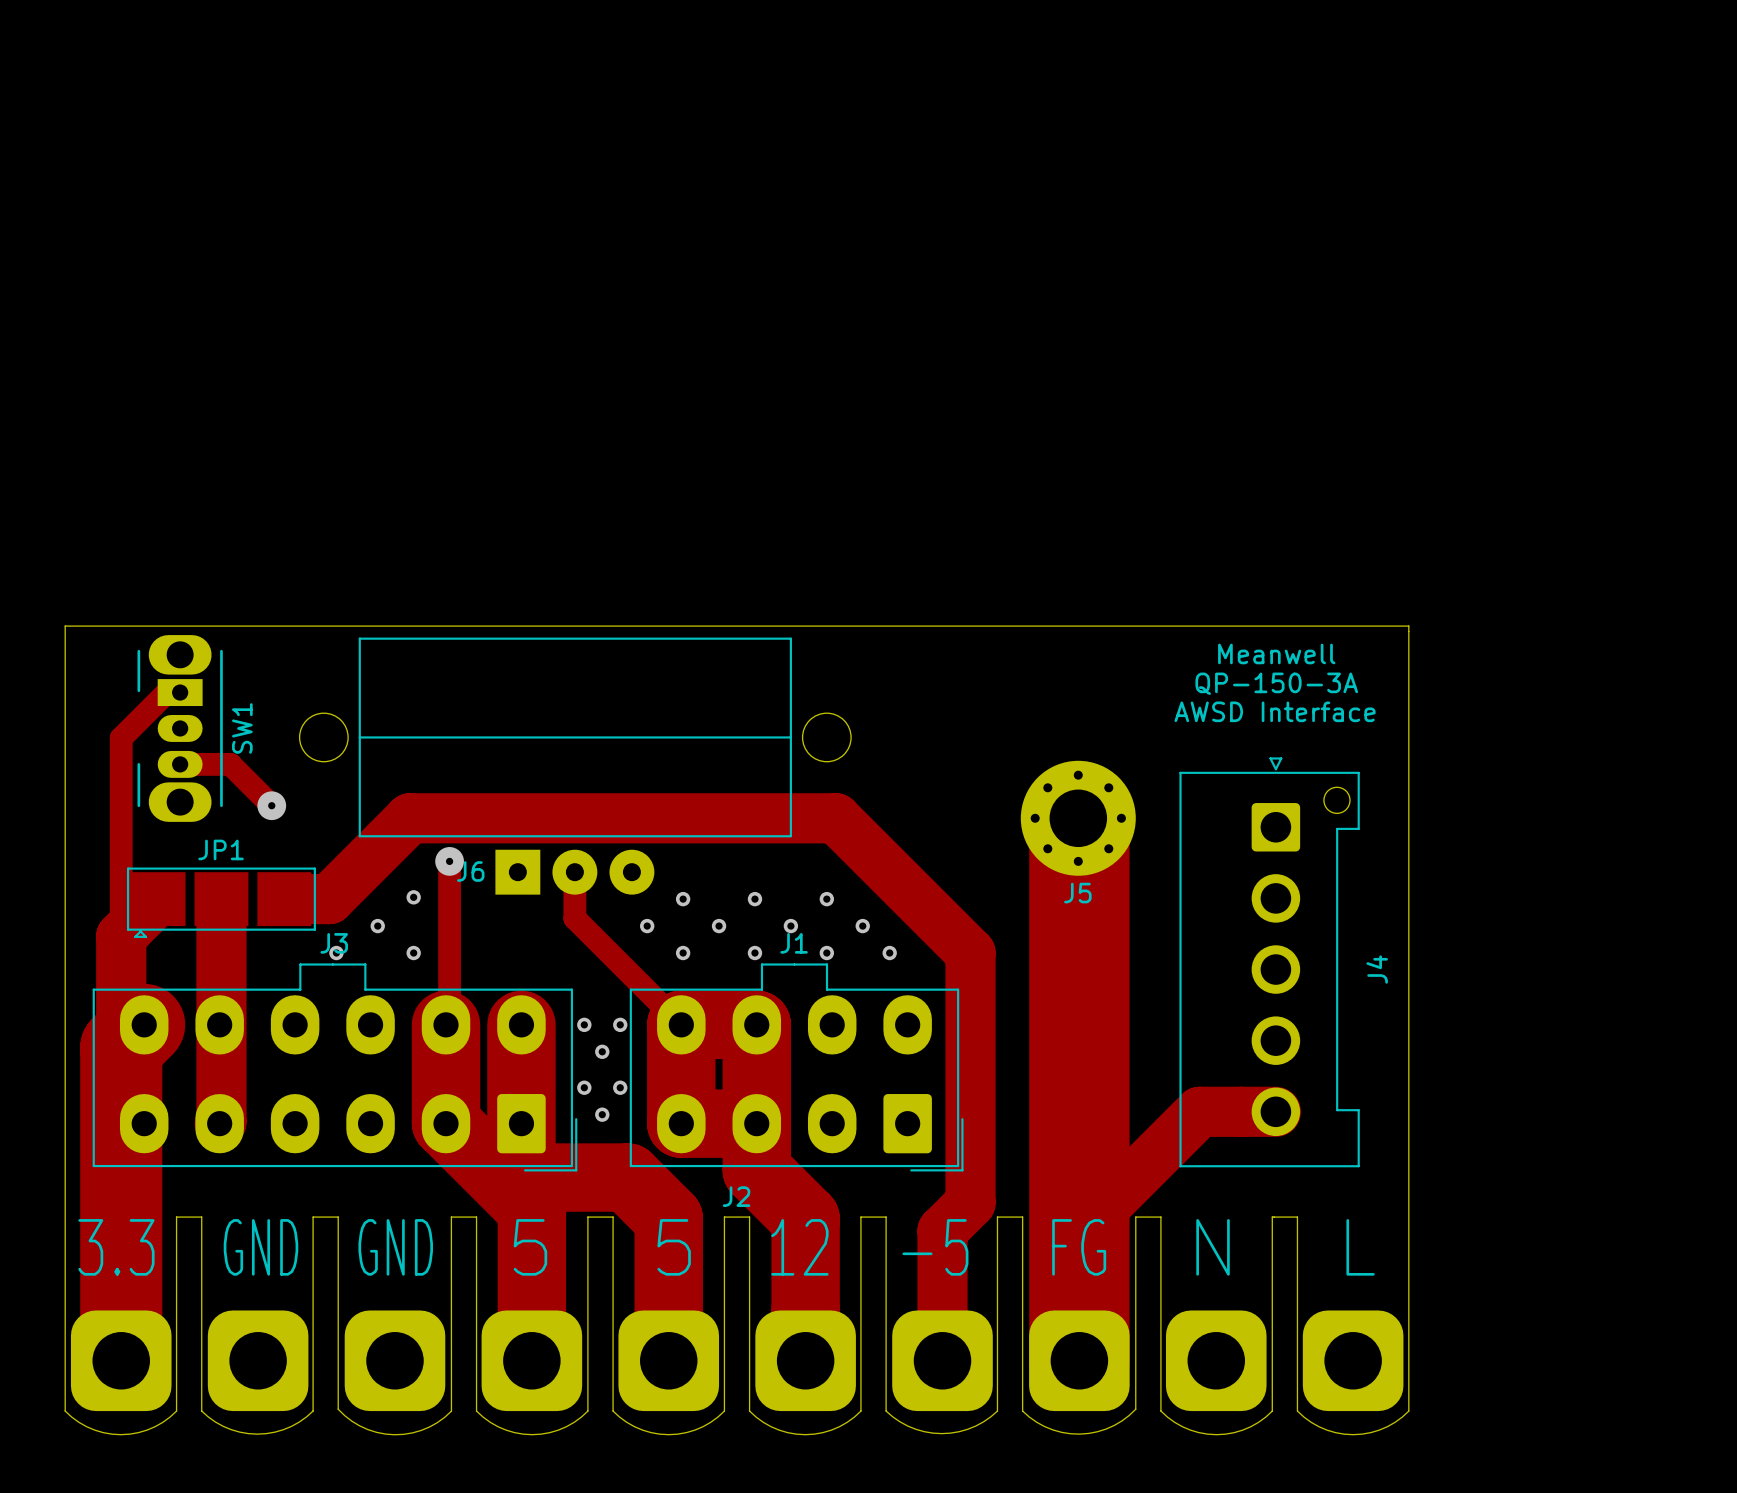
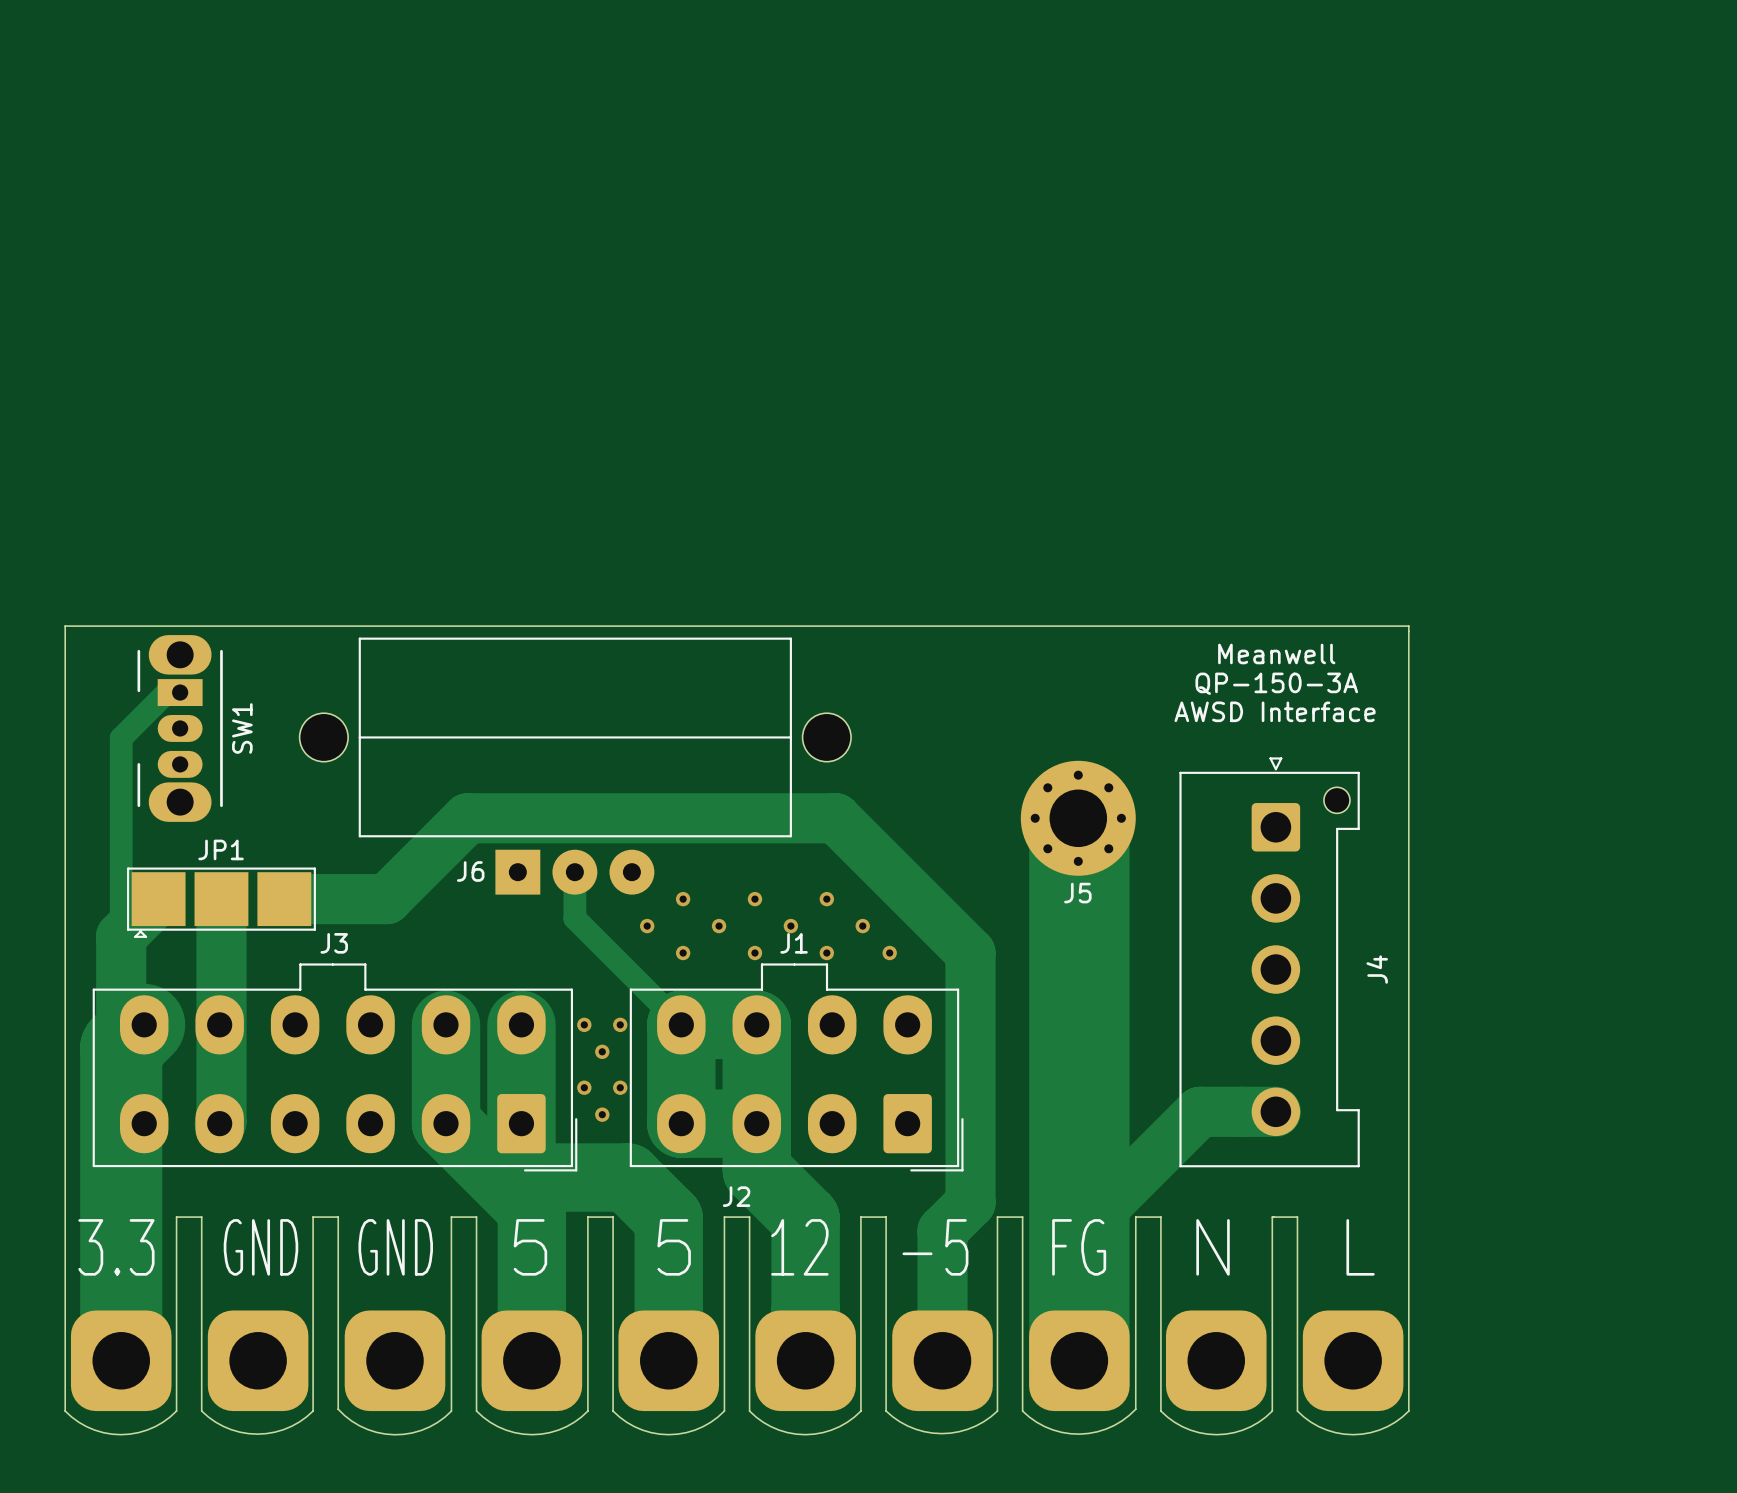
track: (180, 764) (230, 764) (273, 807) -> none
via: (271, 805) -> none
track: (467, 818) (410, 818) (329, 899) -> (467, 818) (386, 899) (329, 899)
track: (449, 861) (449, 1021) (446, 1024) -> none
via: (449, 861) -> none
via: (413, 897) -> none
via: (377, 926) -> none
via: (336, 953) -> none
via: (413, 953) -> none

